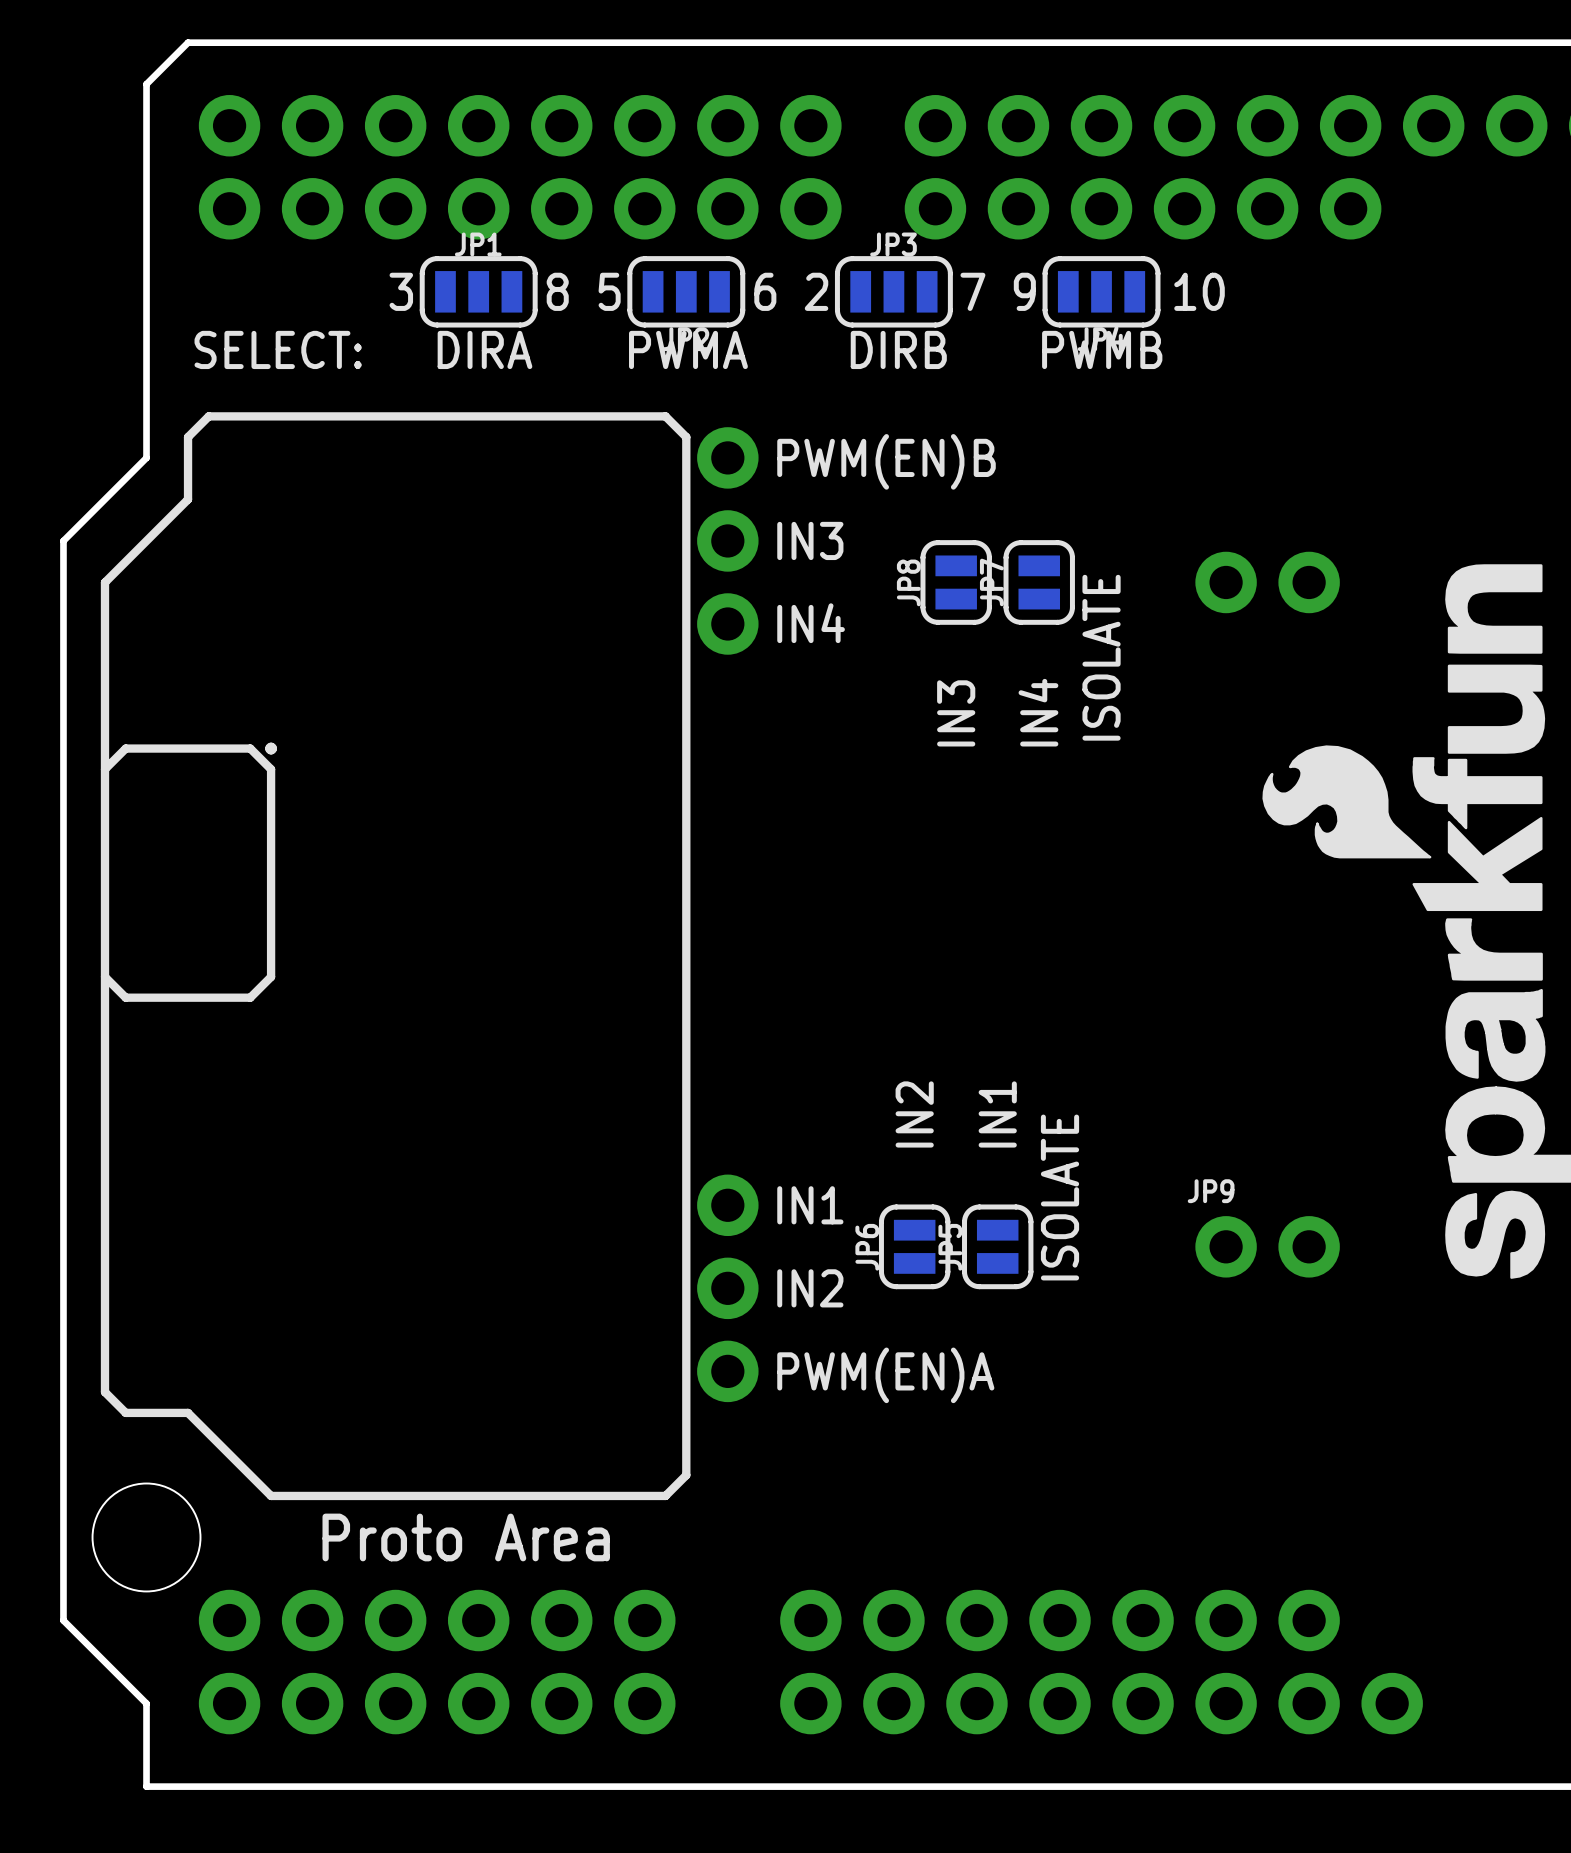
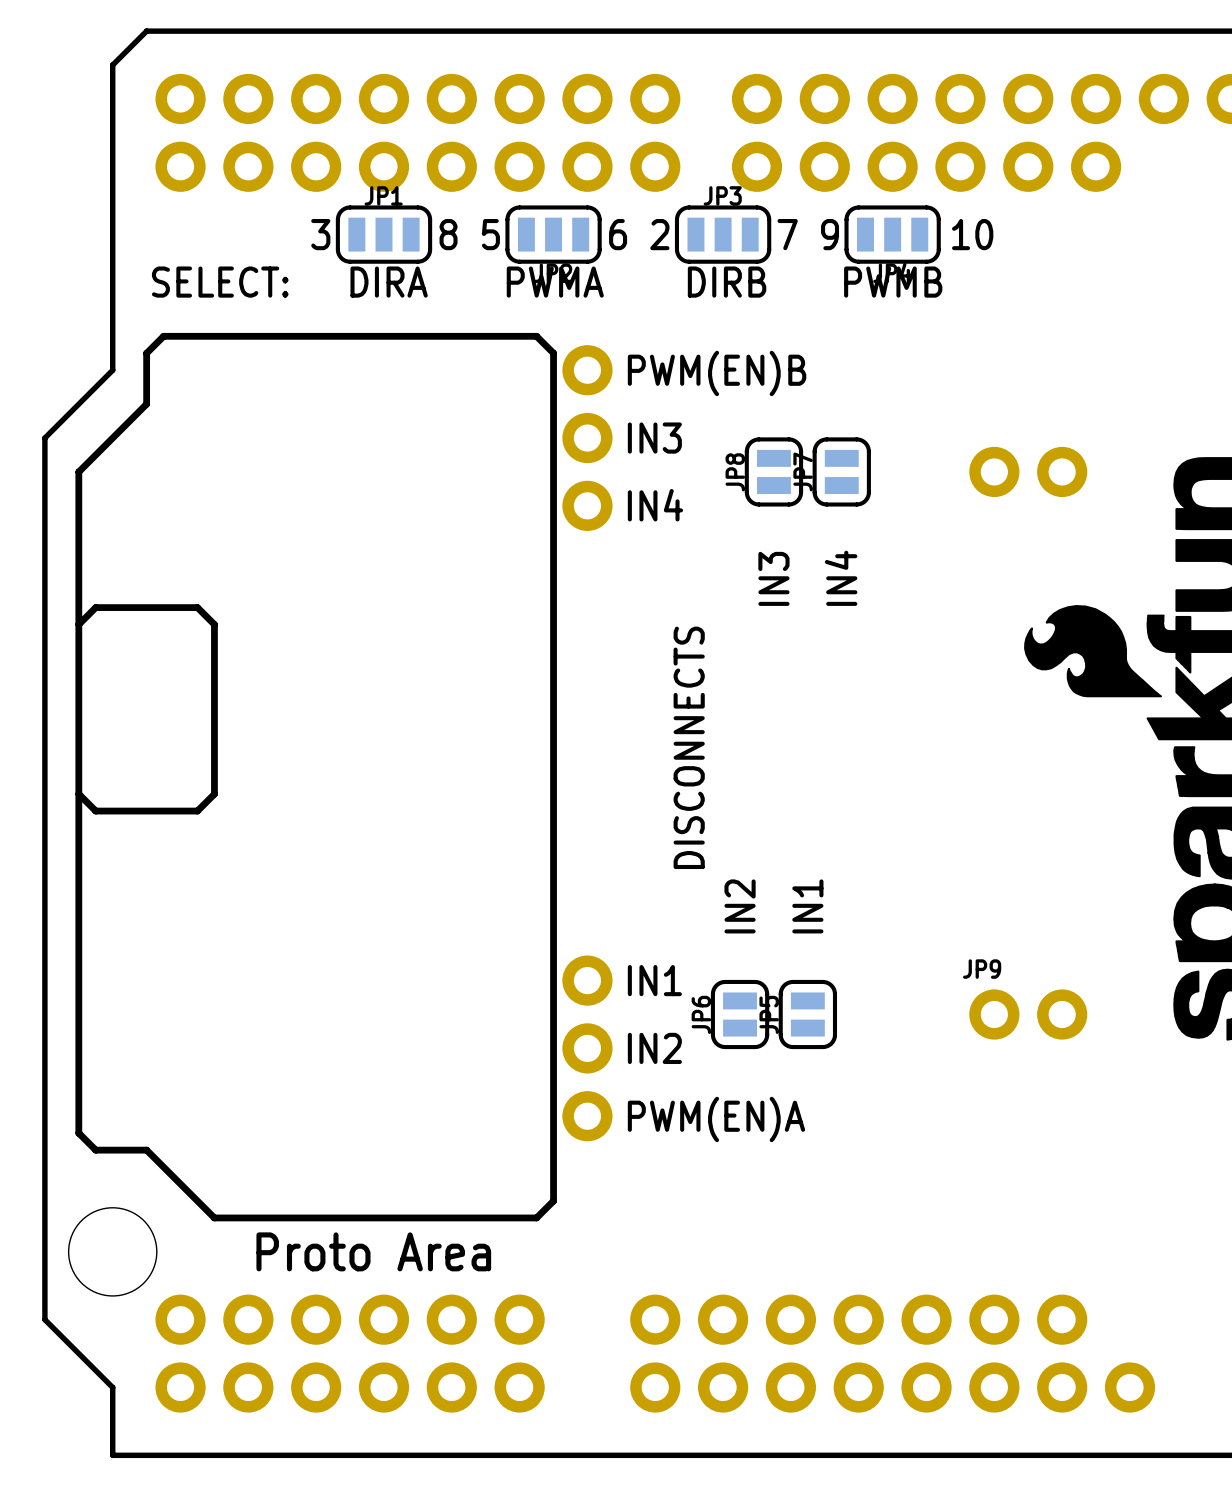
text: ISOLATE (1101, 657) -> none
line: (271, 745) (268, 748) (271, 751) (273, 748) (271, 745) -> none
text: none -> DISCONNECTS (689, 747)
text: ISOLATE (1060, 1197) -> none

